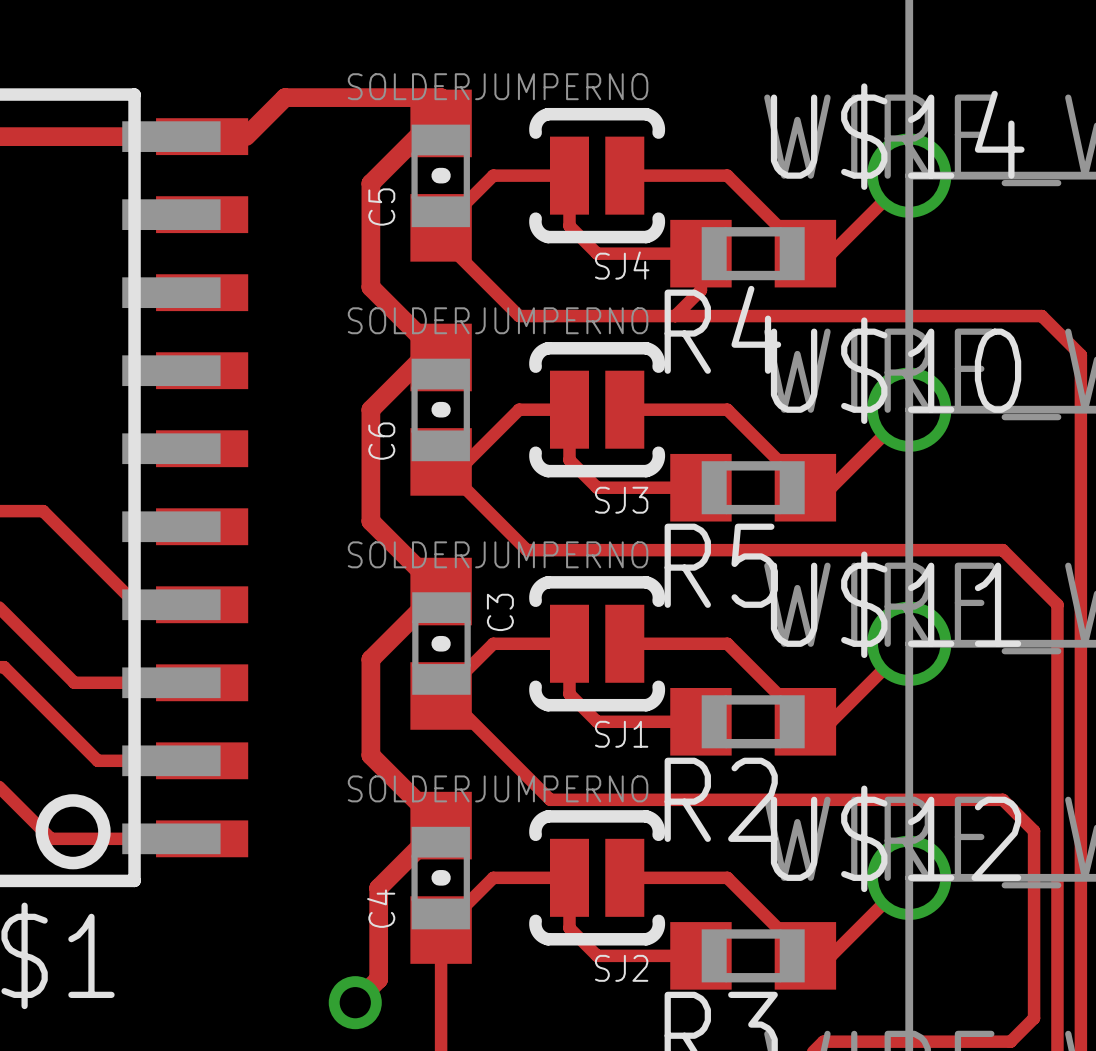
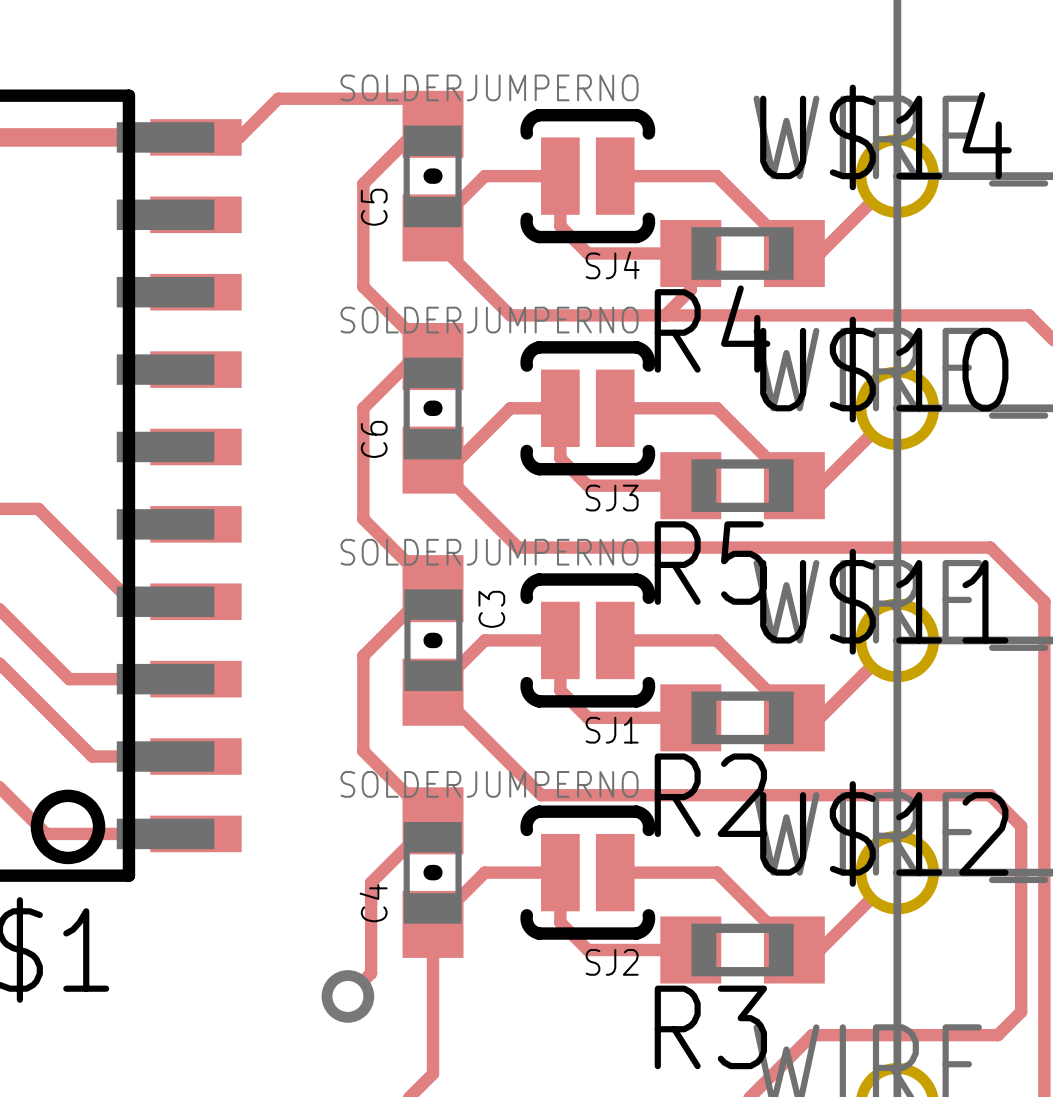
track width: thick (430, 123) (370, 183) (370, 287) (441, 357) -> thin (422, 124) (363, 183) (363, 286) (433, 356)
track width: thick (441, 123) (441, 97) (285, 97) (246, 136) -> thin (433, 124) (433, 98) (278, 98) (239, 137)
track width: thick (423, 357) (370, 409) (370, 521) (441, 591) -> thin (415, 356) (363, 408) (363, 519) (433, 588)
track width: thick (438, 591) (370, 659) (370, 755) (441, 825) (378, 888) (378, 979) (355, 1002) -> thin (430, 588) (363, 655) (363, 751) (433, 820) (371, 882) (371, 973) (347, 996)

